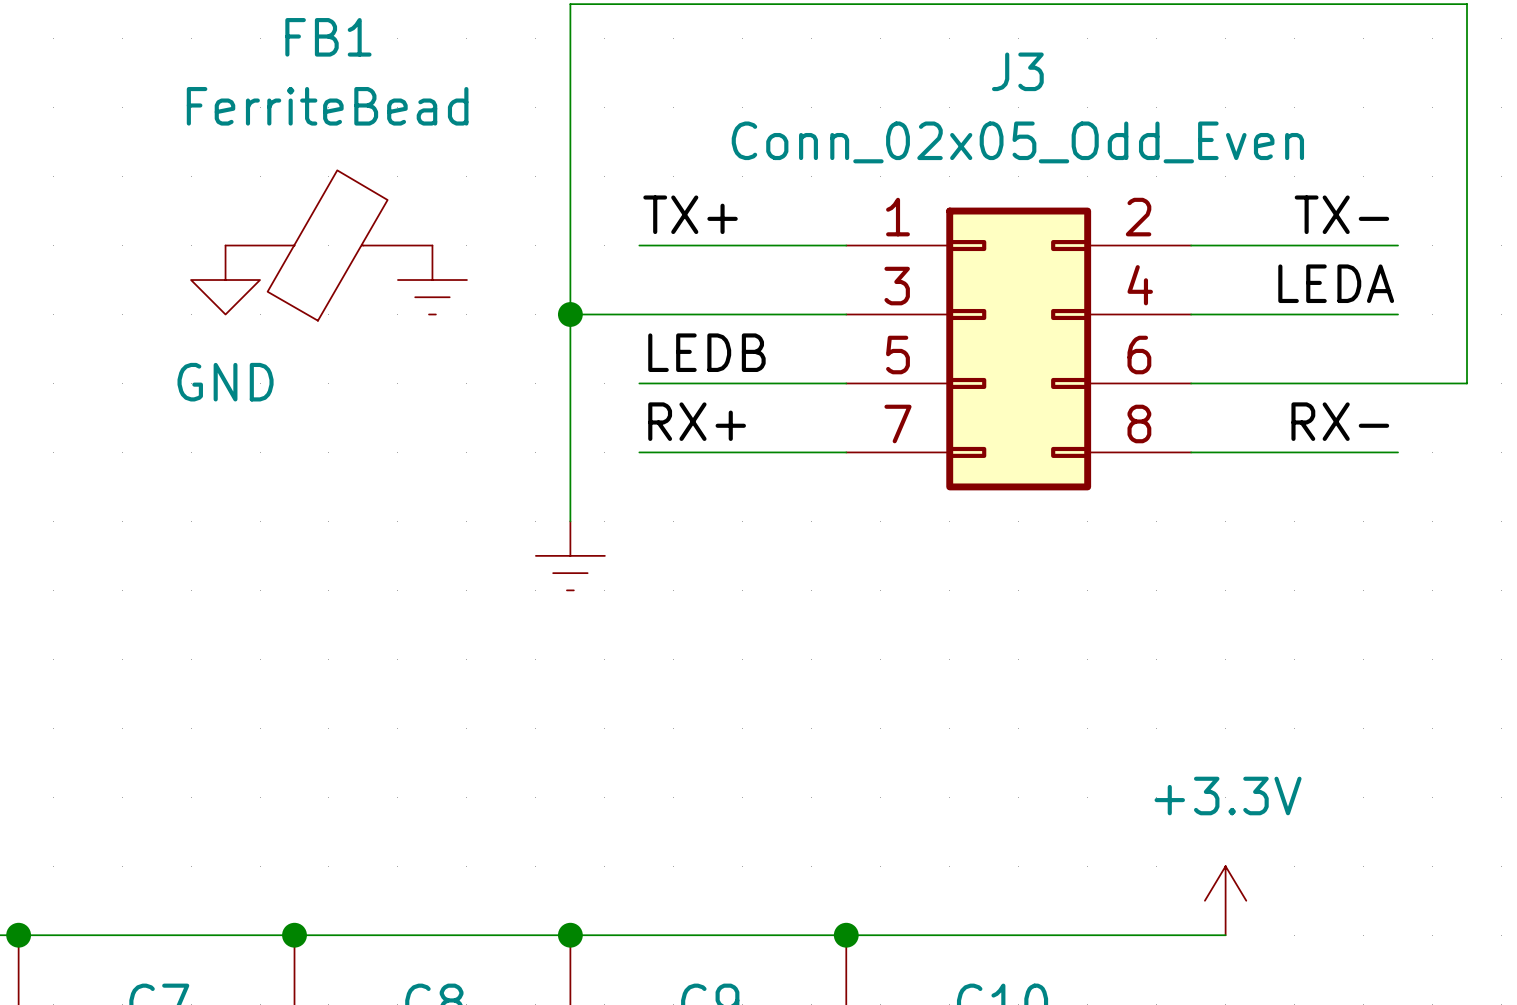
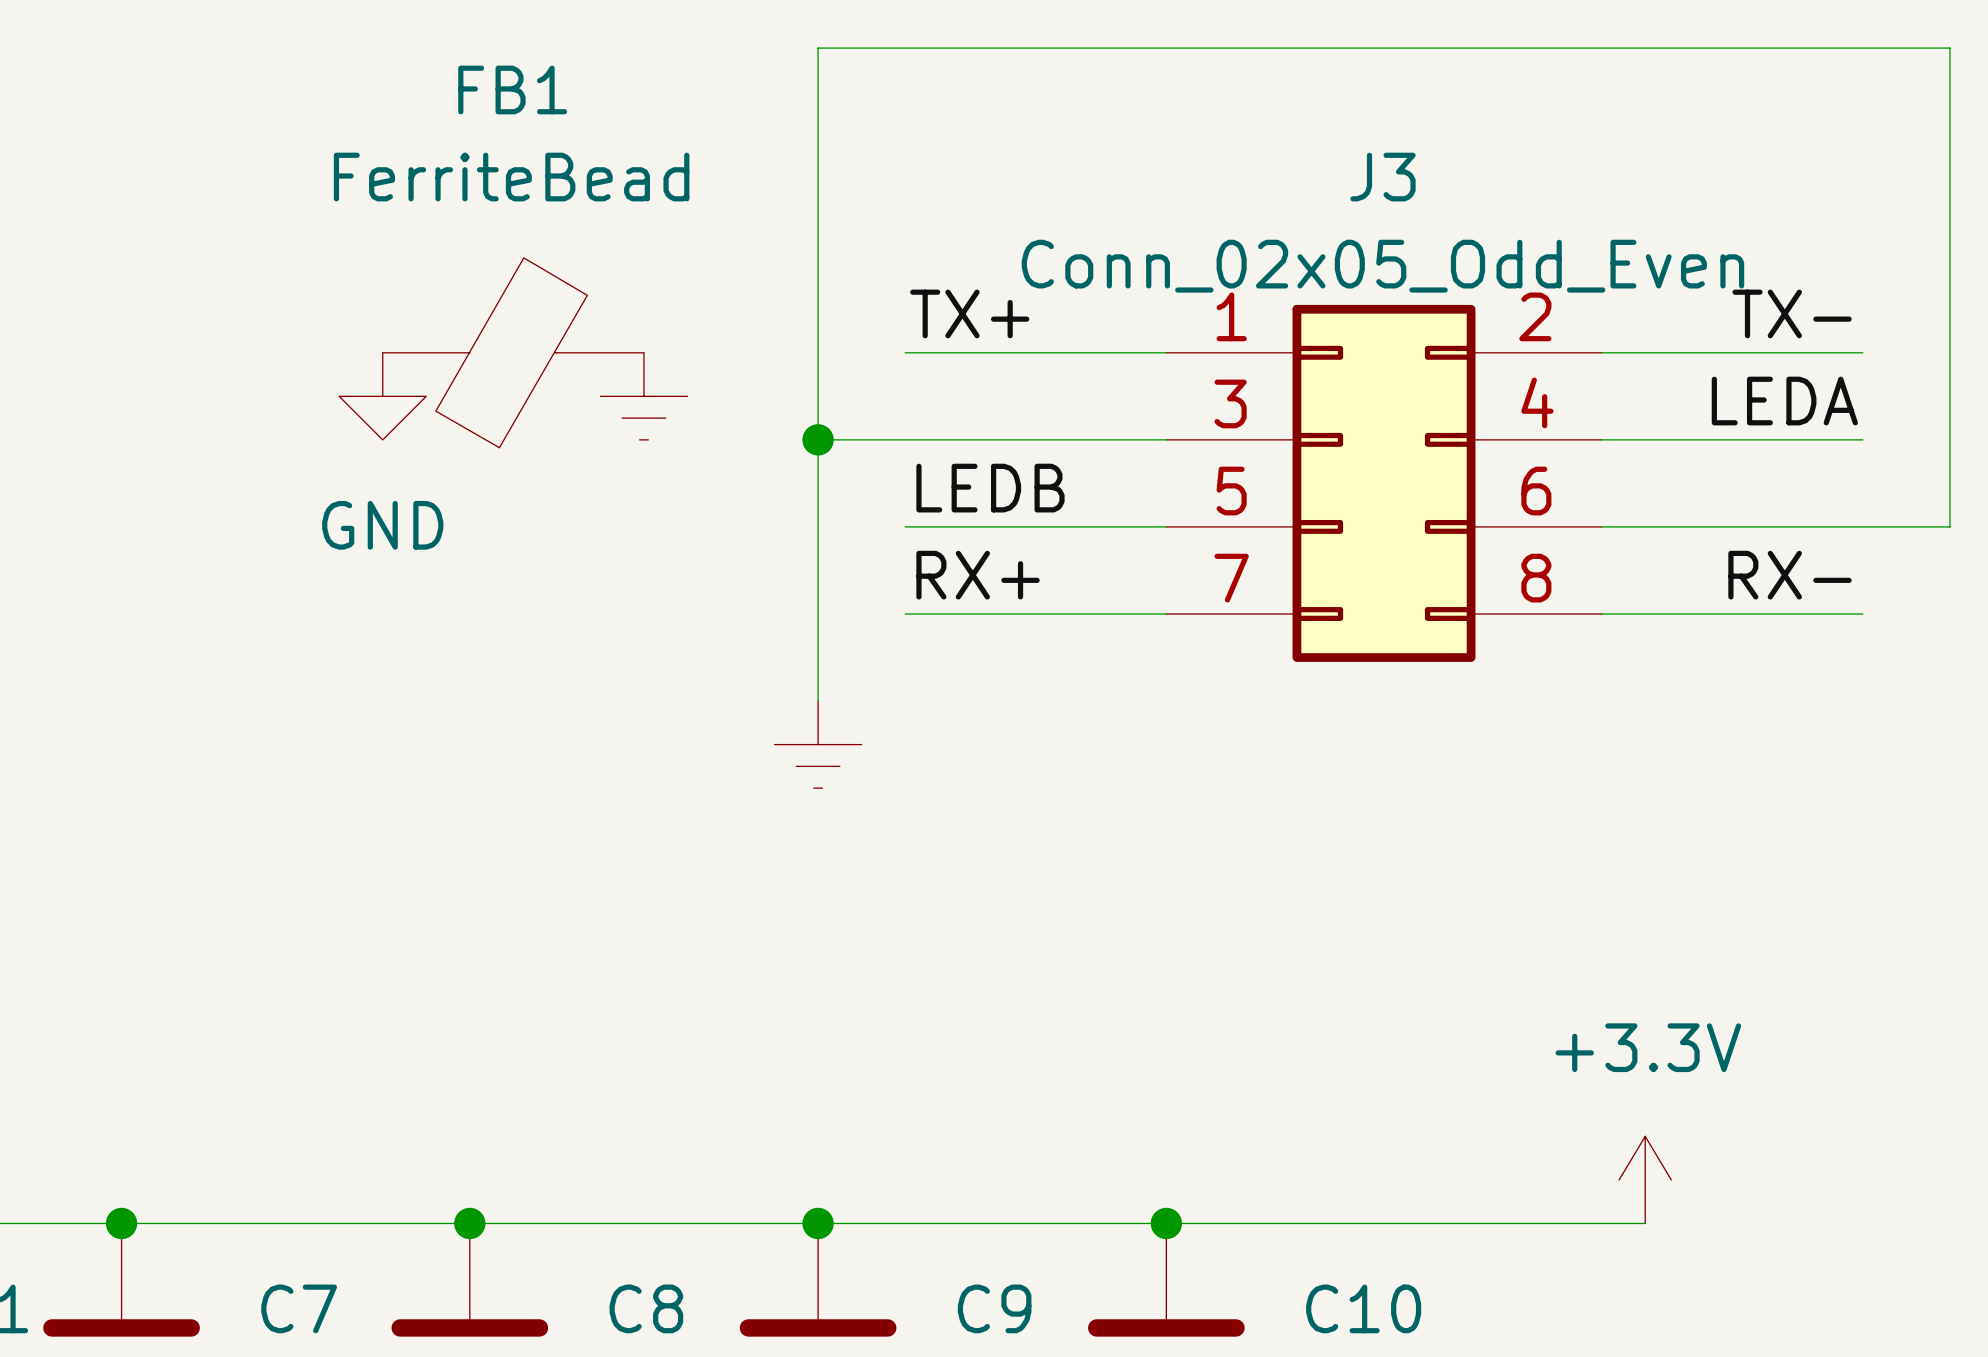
J3 name position: J3 (1017, 71) -> J3 (1382, 177)
J3 value position: Conn_02x05_Odd_Even (1017, 142) -> Conn_02x05_Odd_Even (1382, 266)

